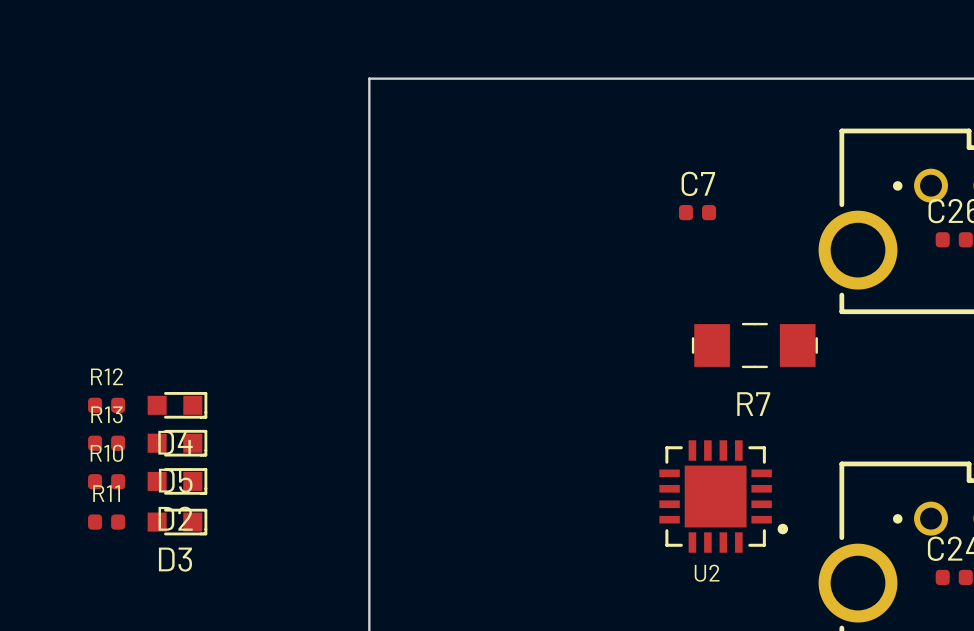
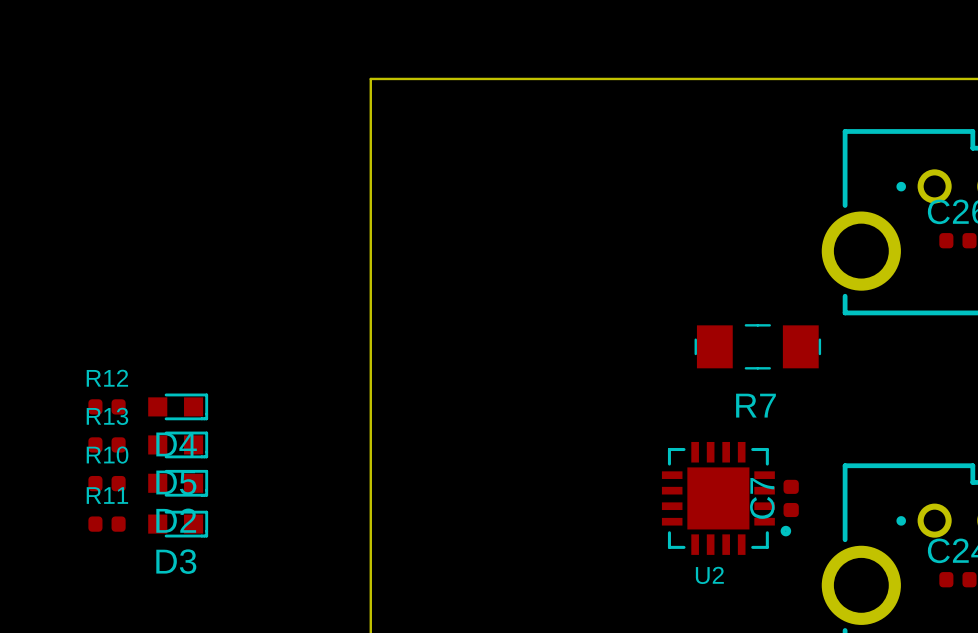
C7 rotation: 0° (697, 212) -> 90° clockwise (791, 498)
C7 position: (697, 212) -> (791, 498)

